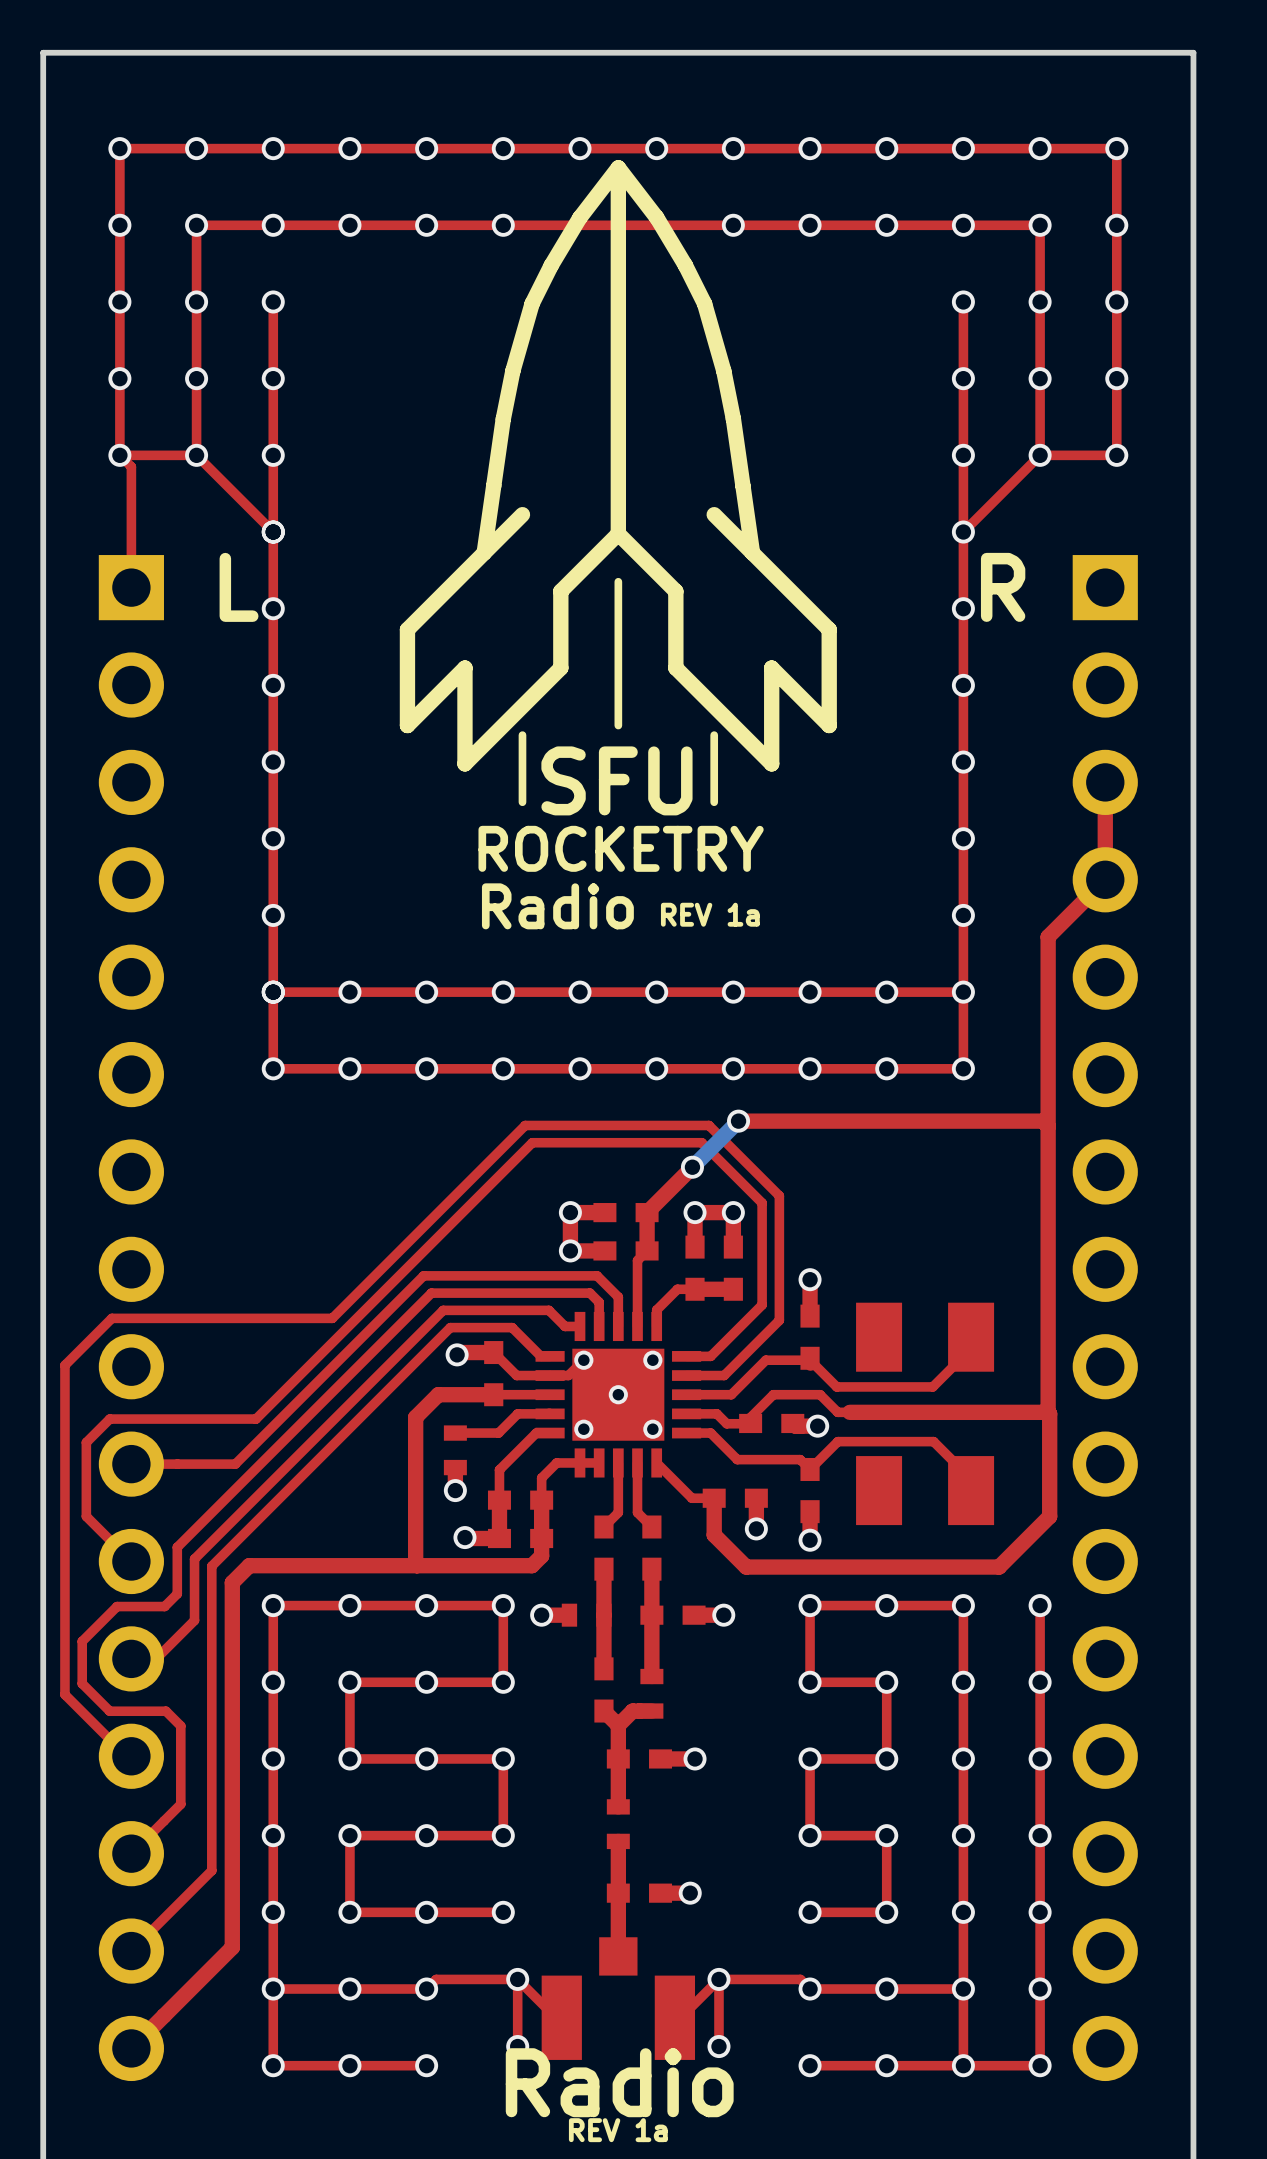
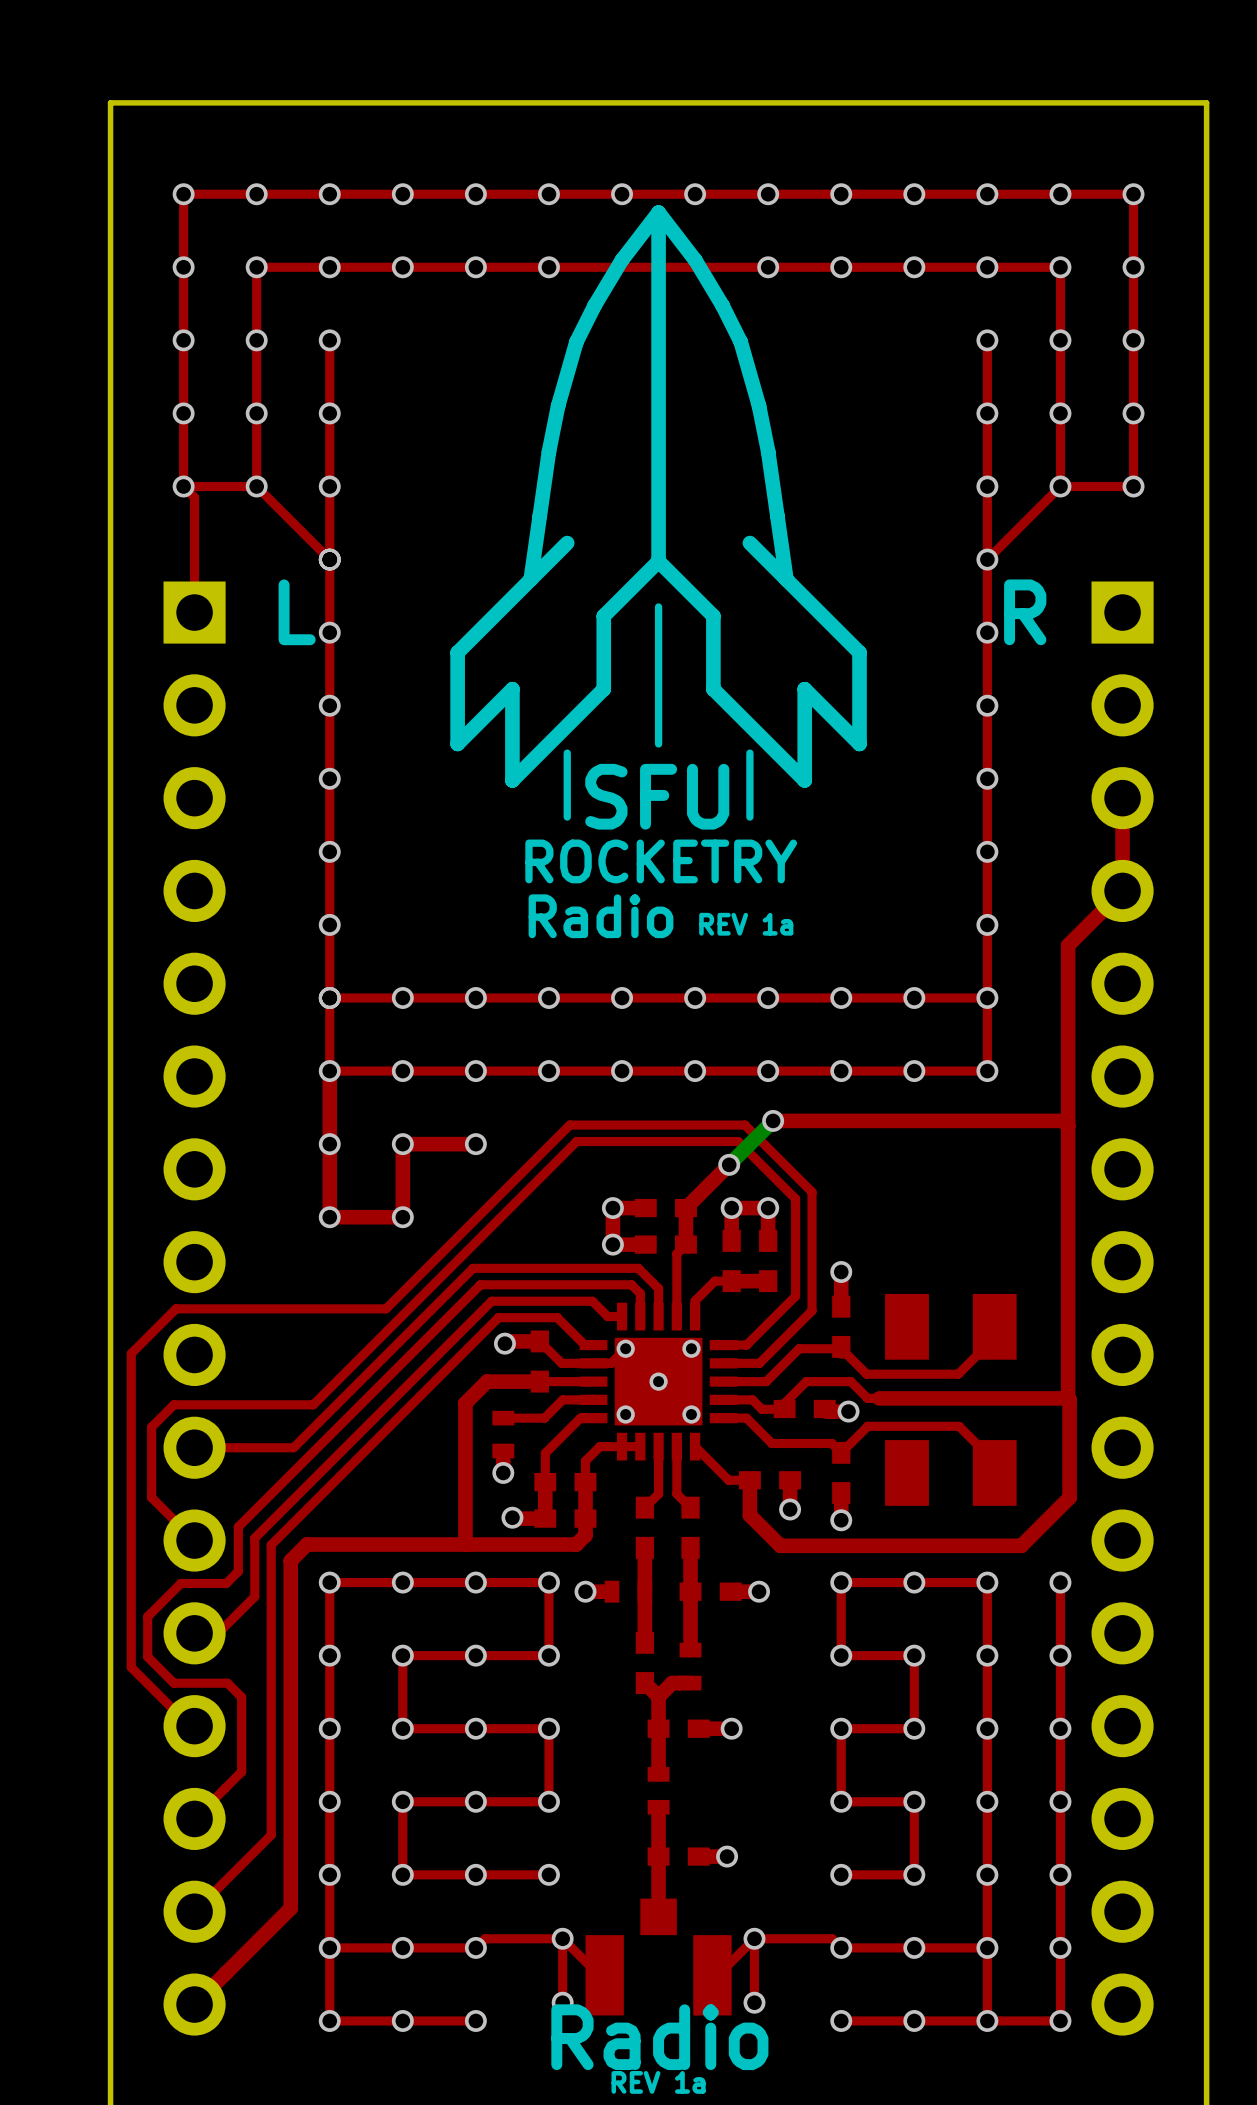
top track: none -> (329, 1071) (329, 1217) (402, 1217) (402, 1144) (475, 1144)
via: none -> (329, 1144)
via: none -> (402, 1144)
via: none -> (475, 1144)
via: none -> (329, 1217)
via: none -> (402, 1217)

